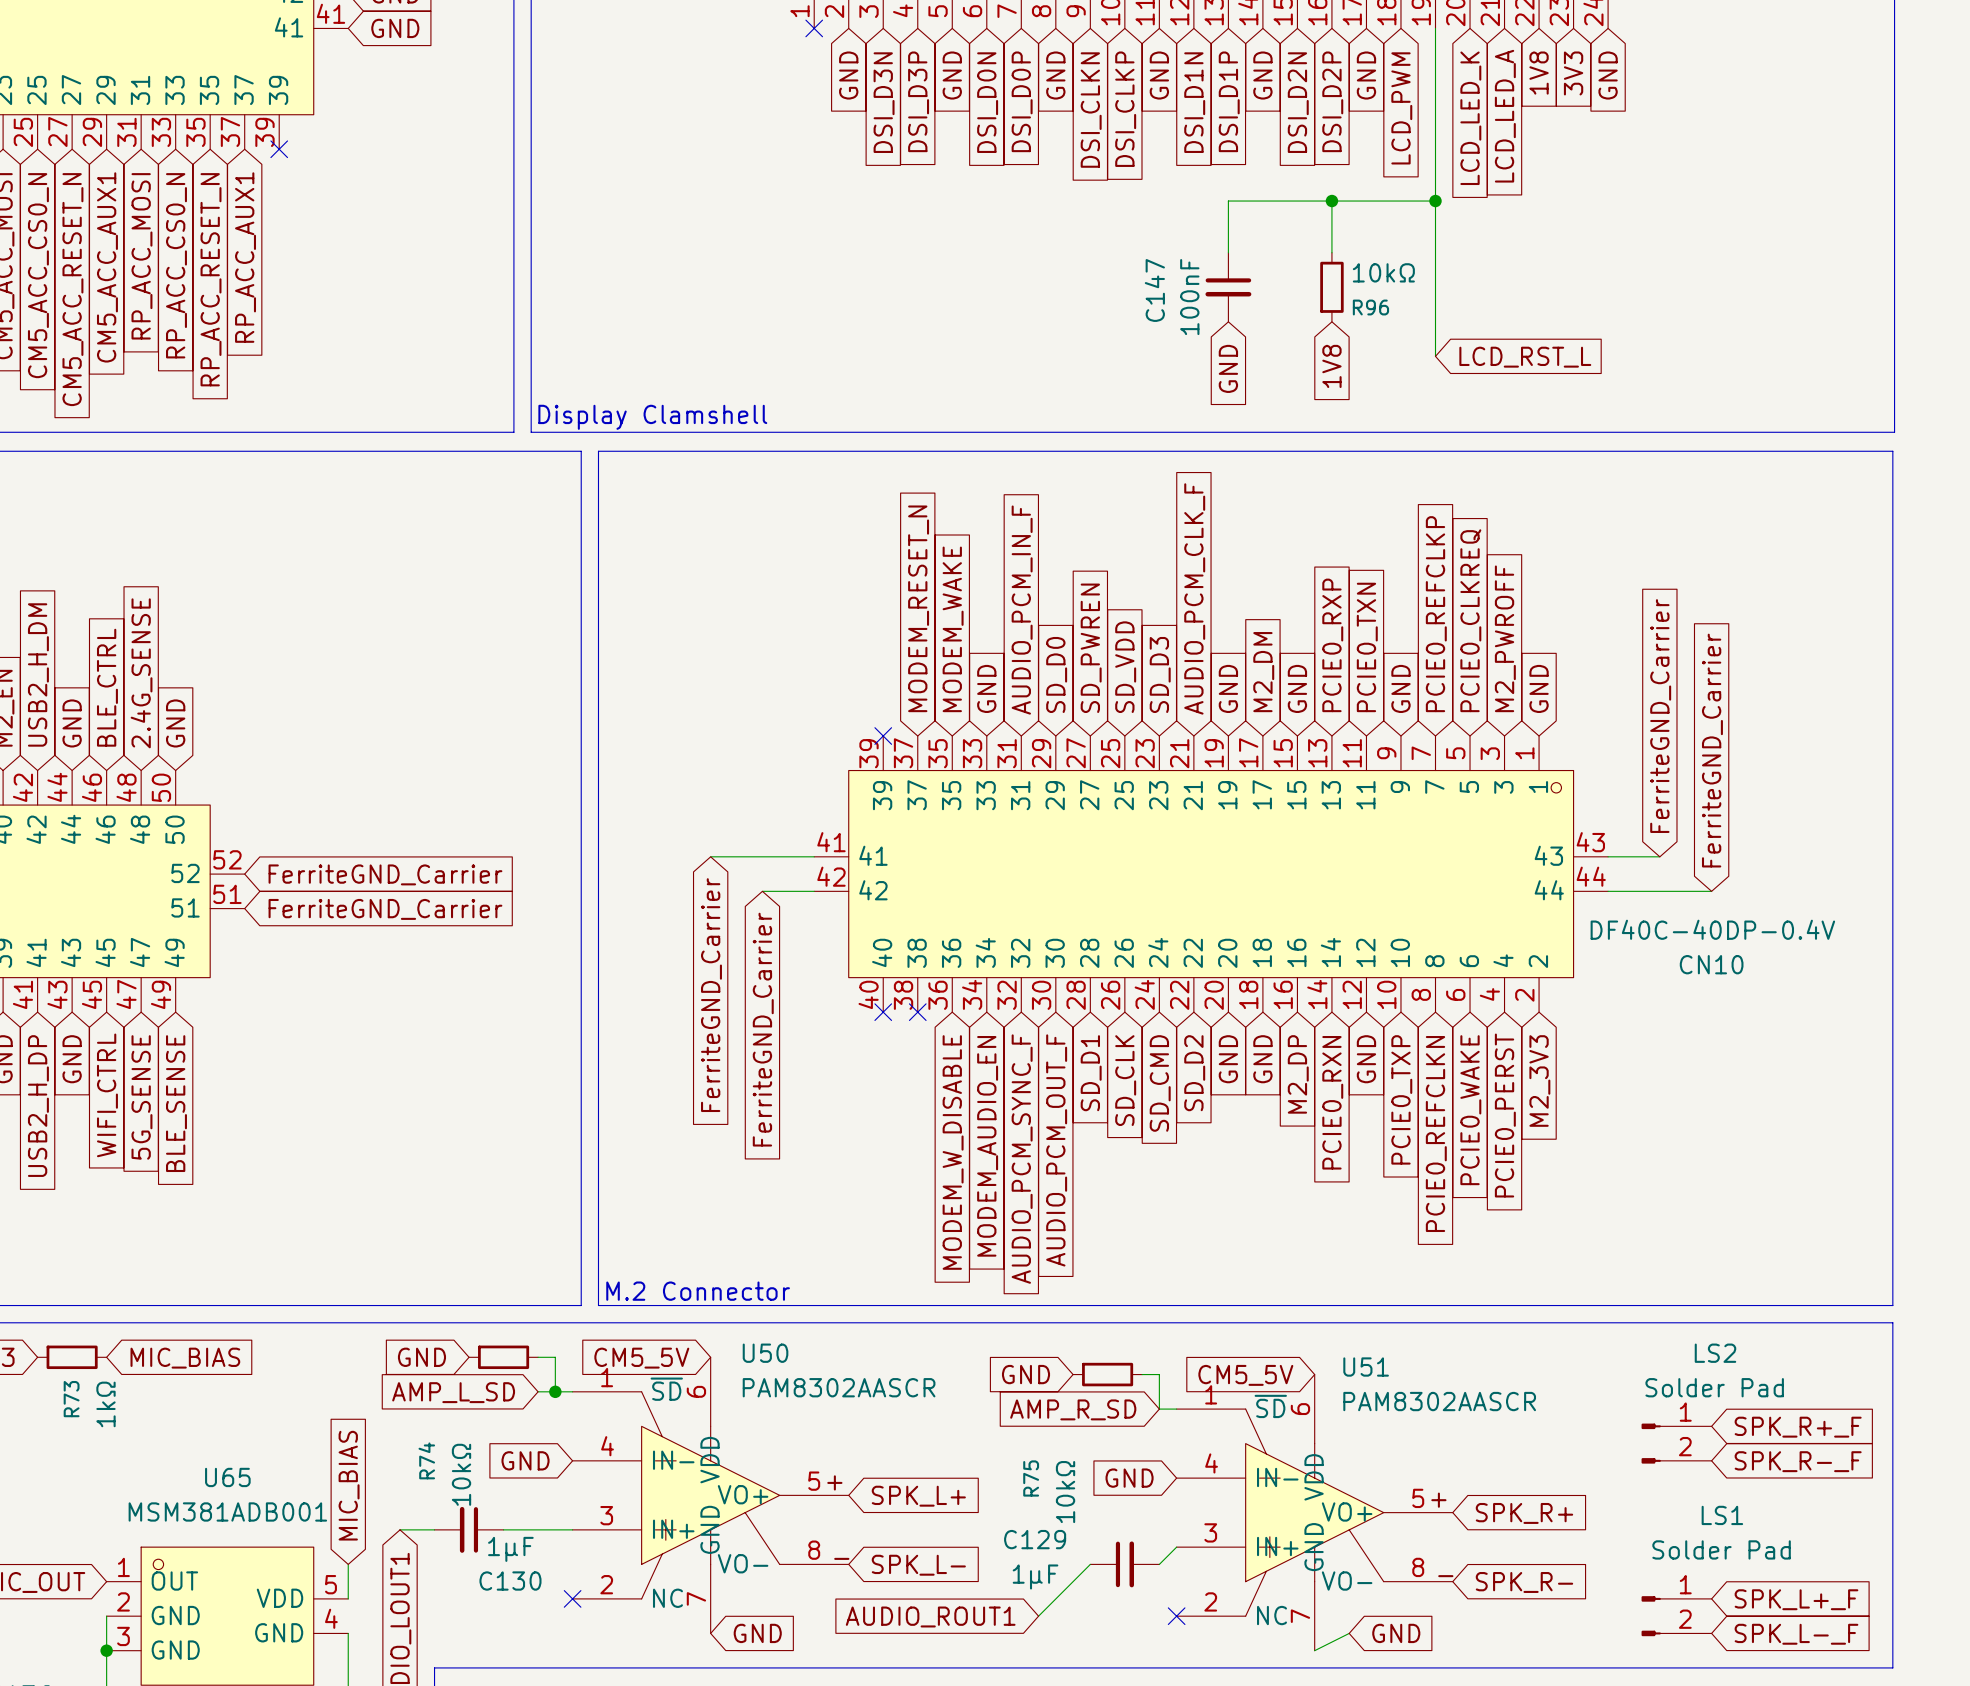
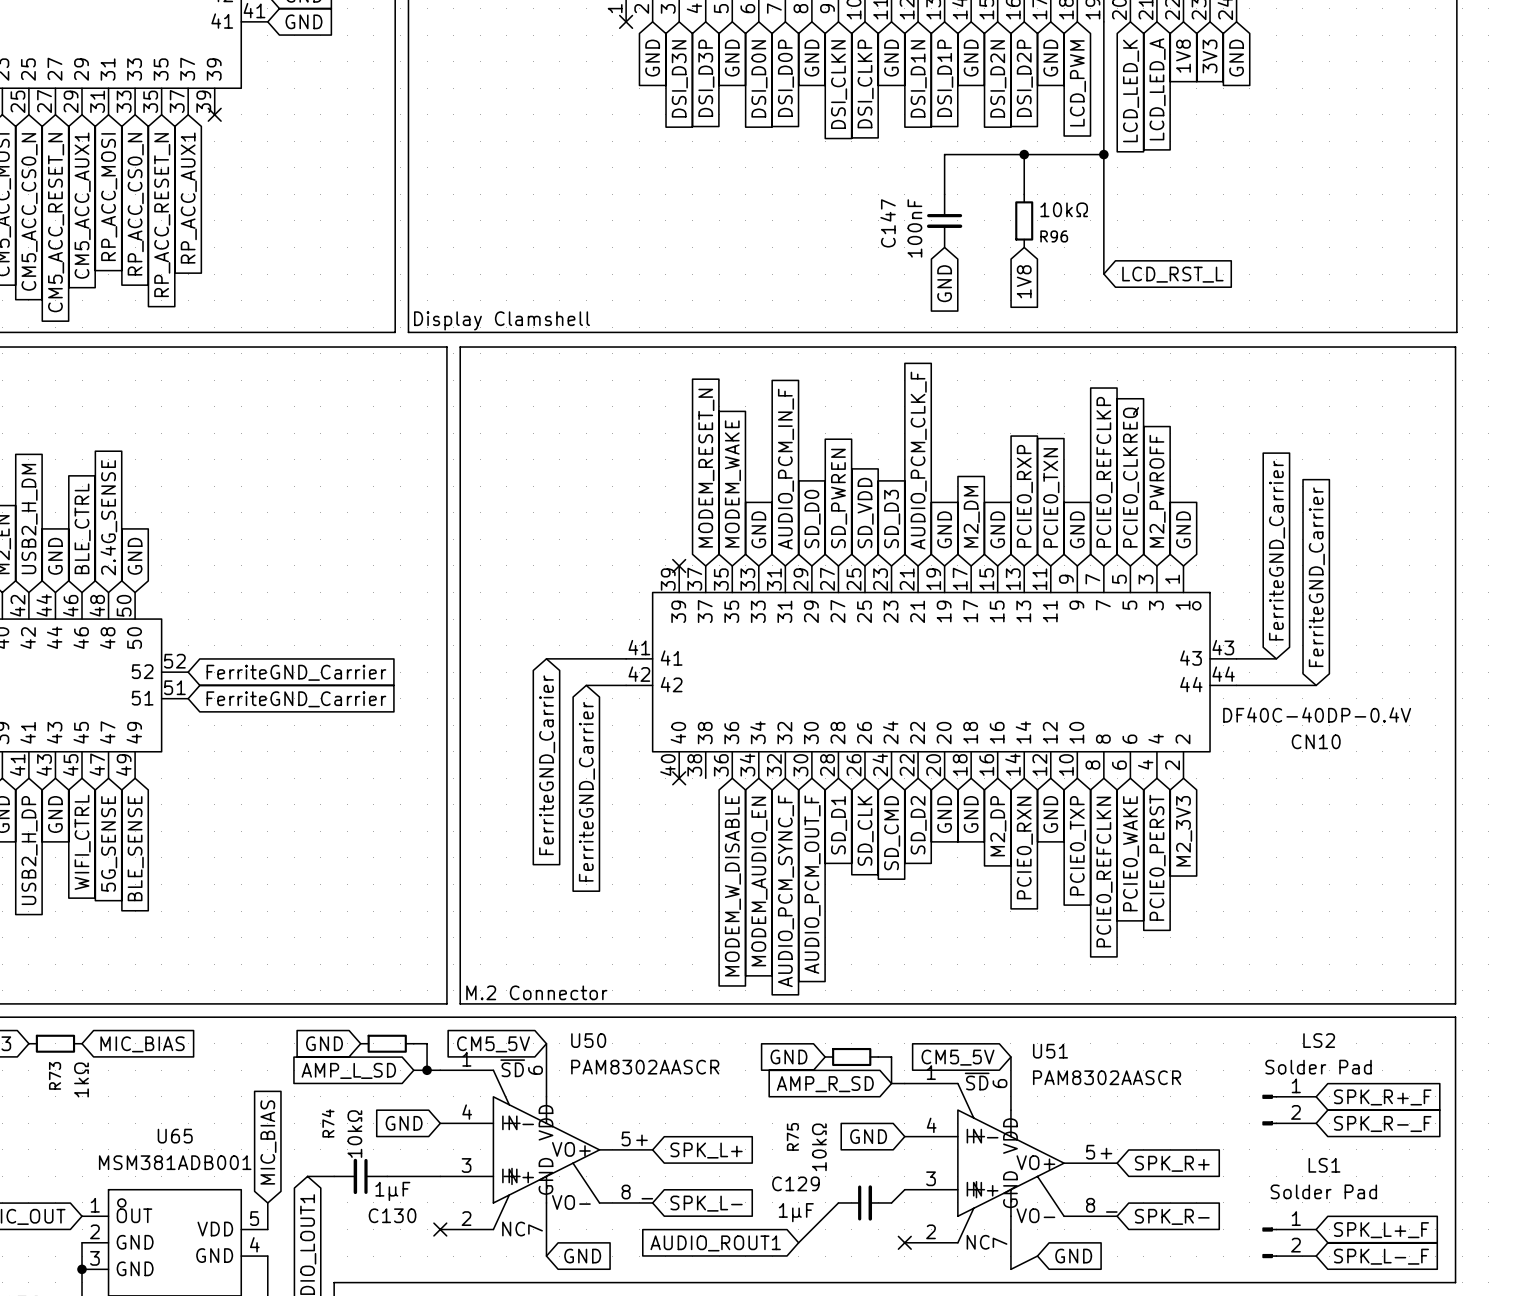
no-connect mark: (917, 1012) -> none

